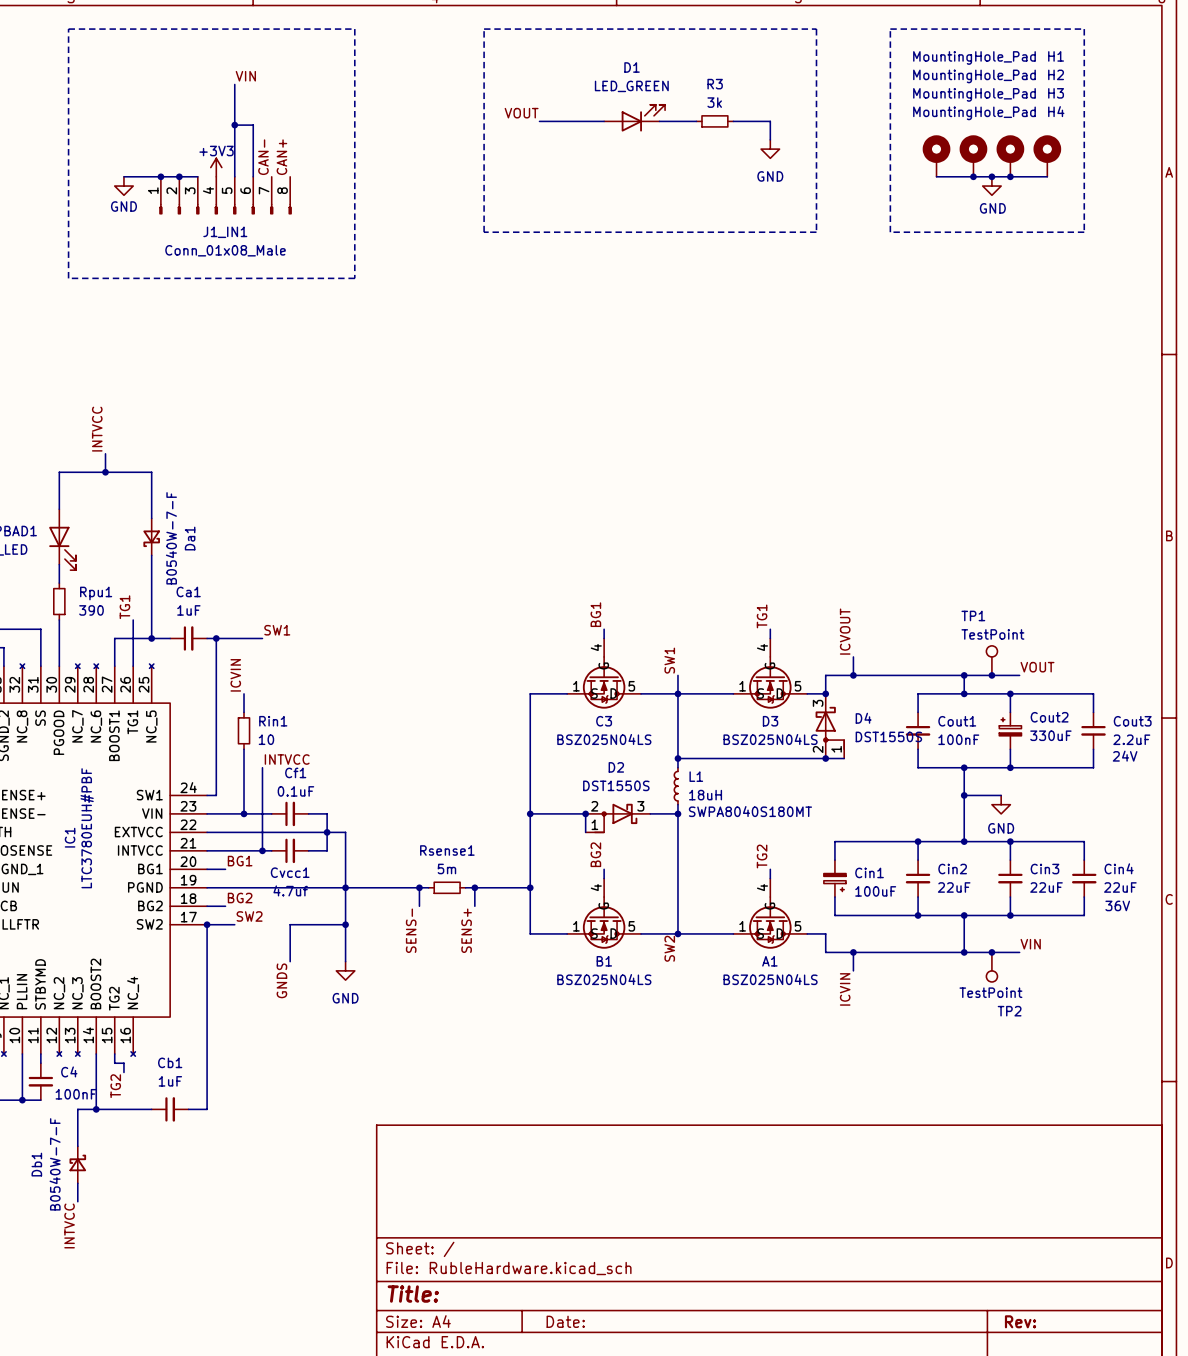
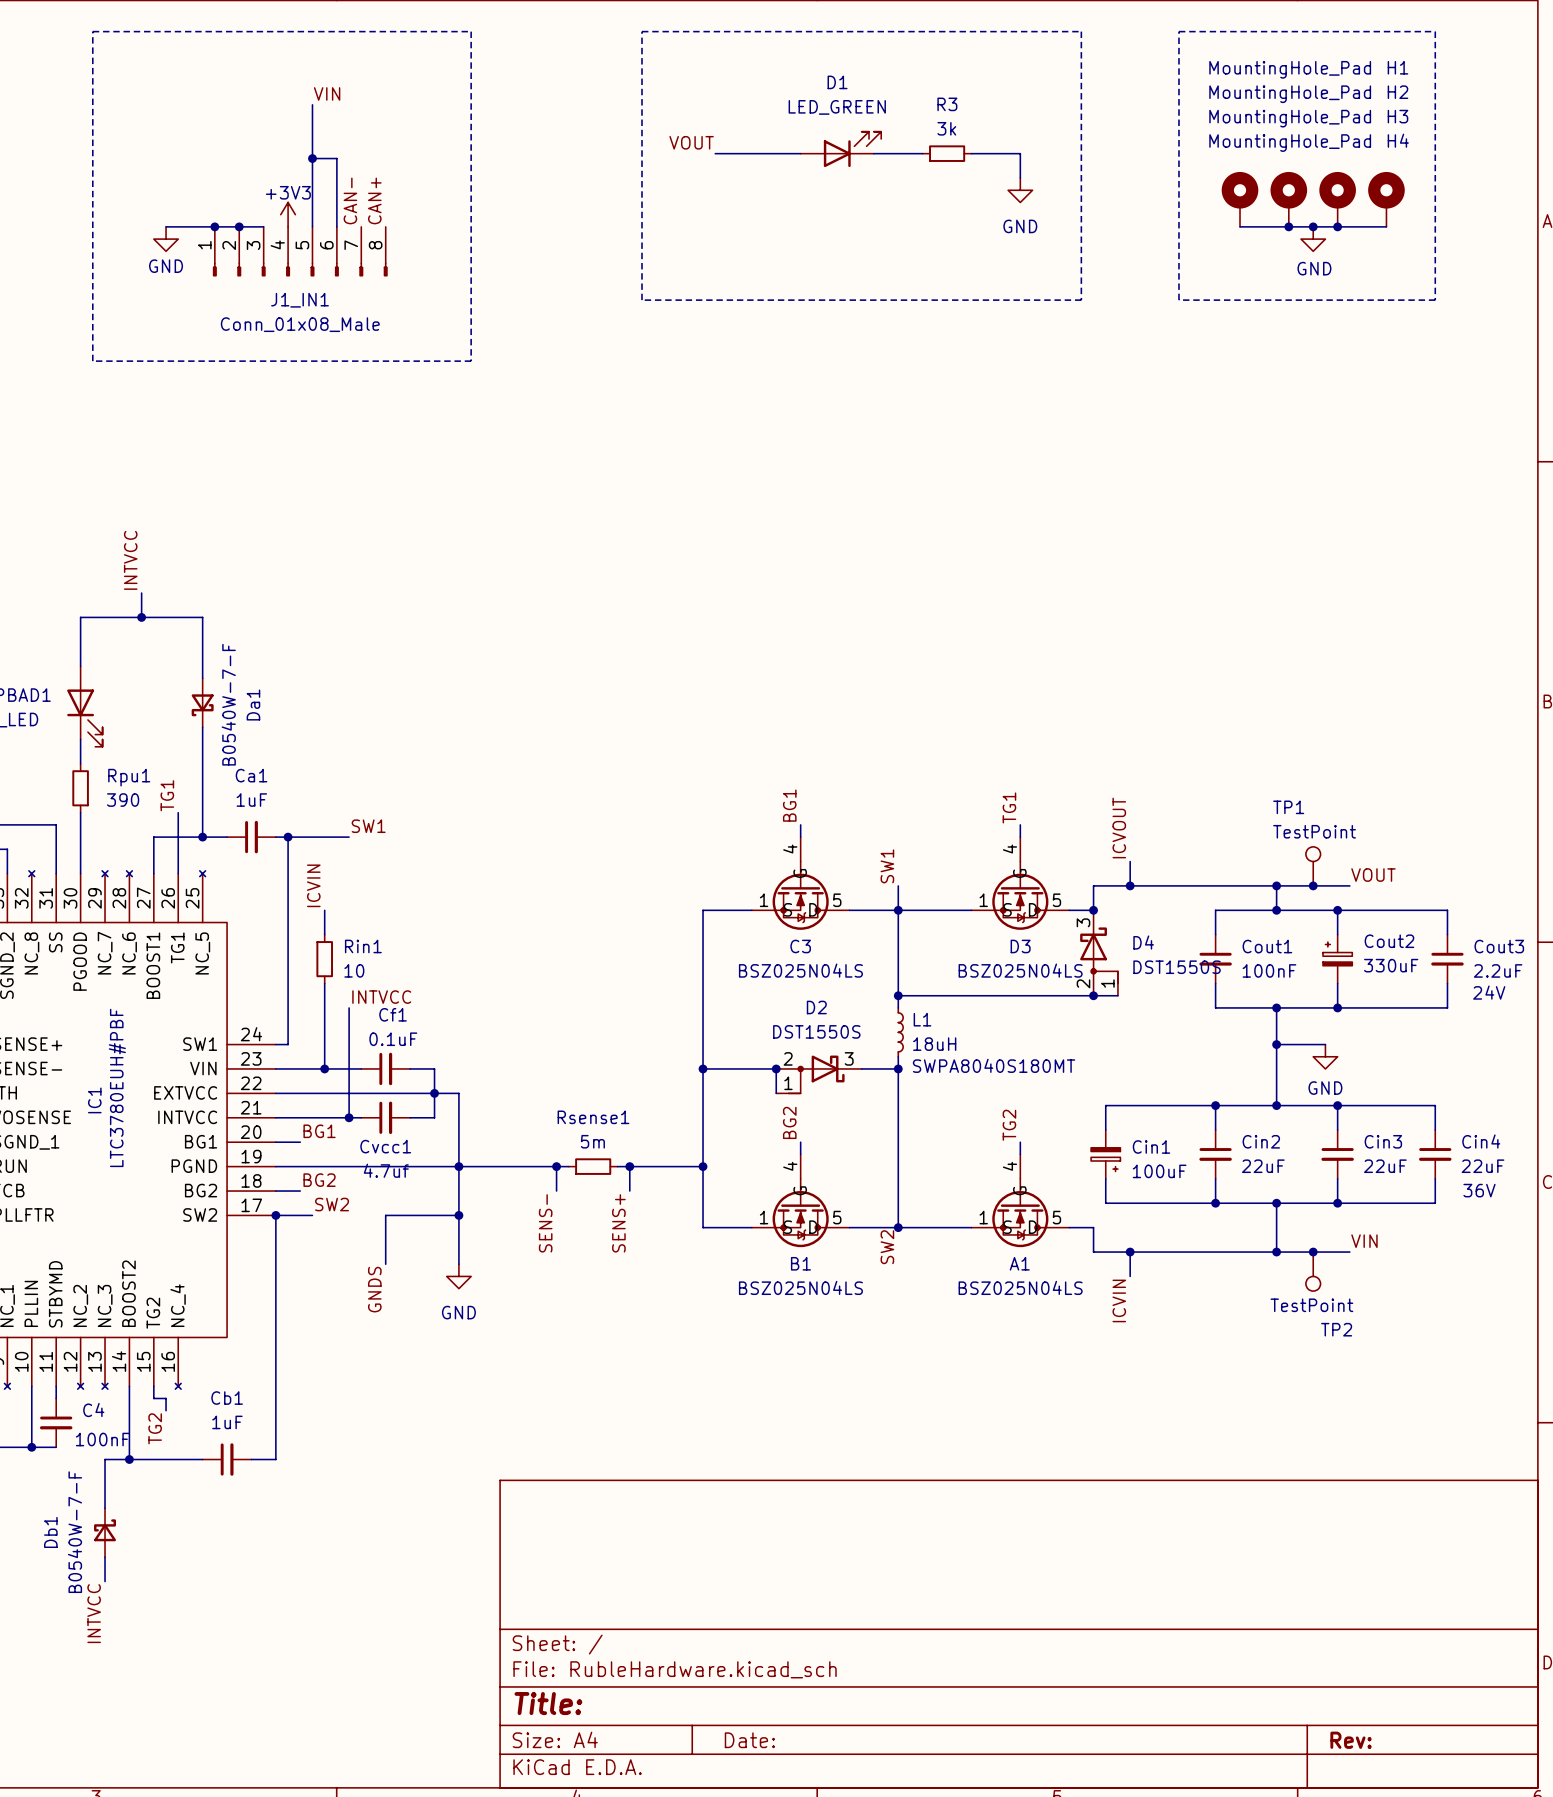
L1 rotation: 0° (676, 786) -> 180° (900, 1032)

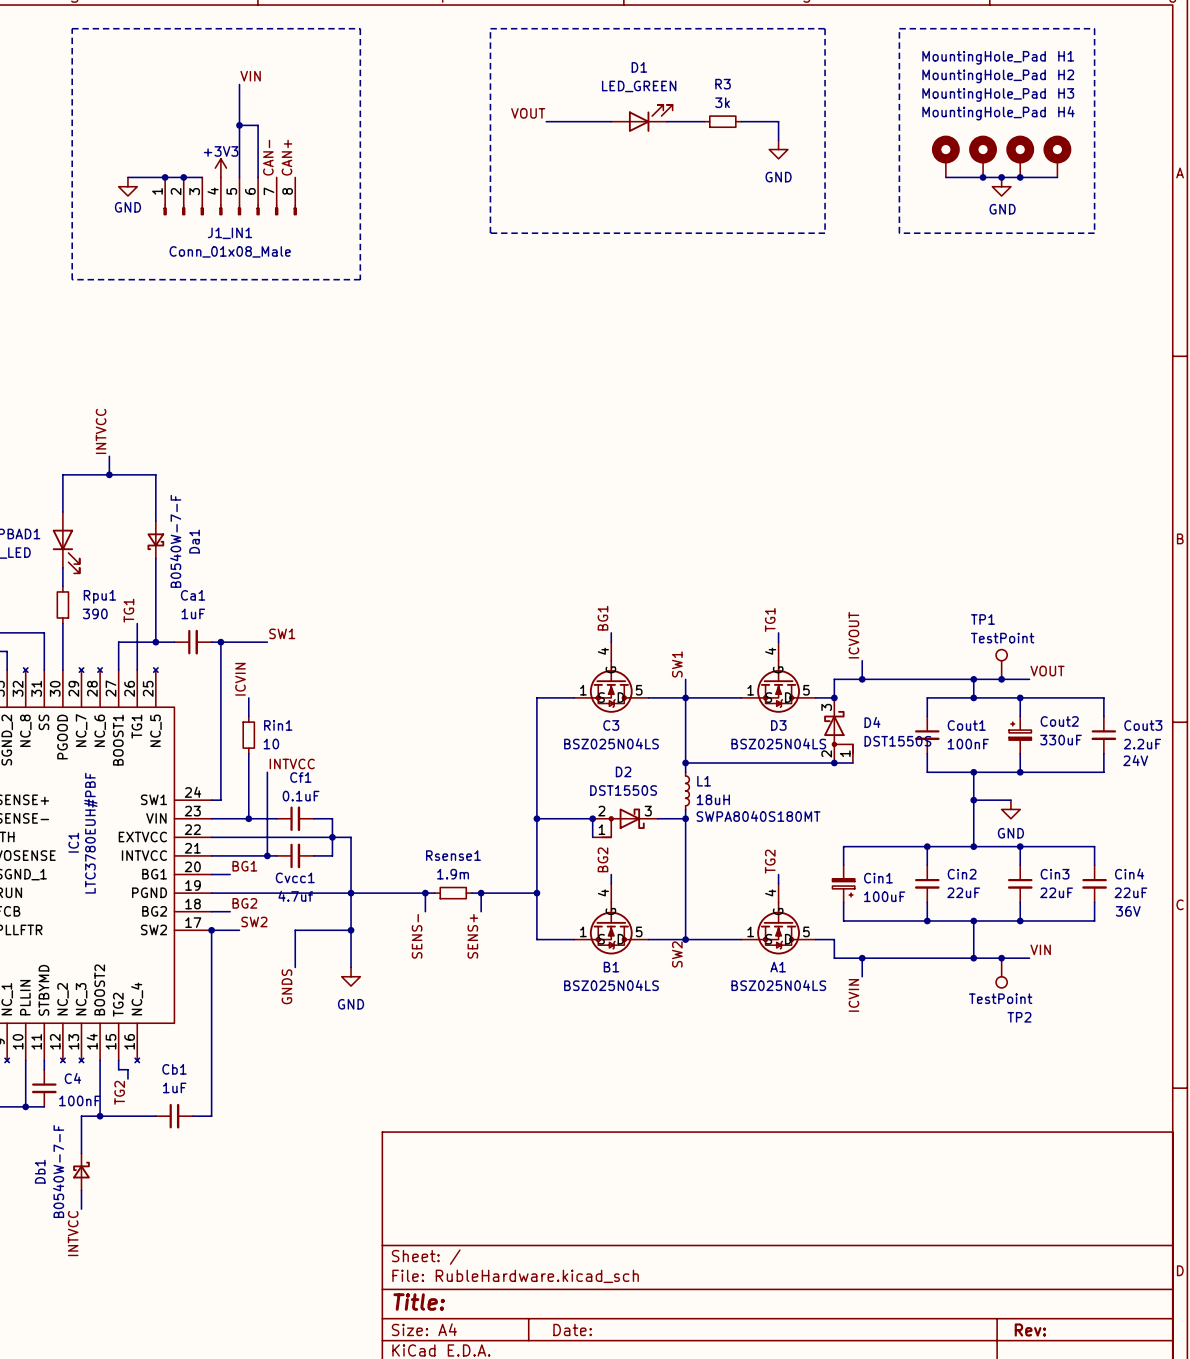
Rsense1 value: 5m (592, 1141) -> 1.9m (453, 874)

